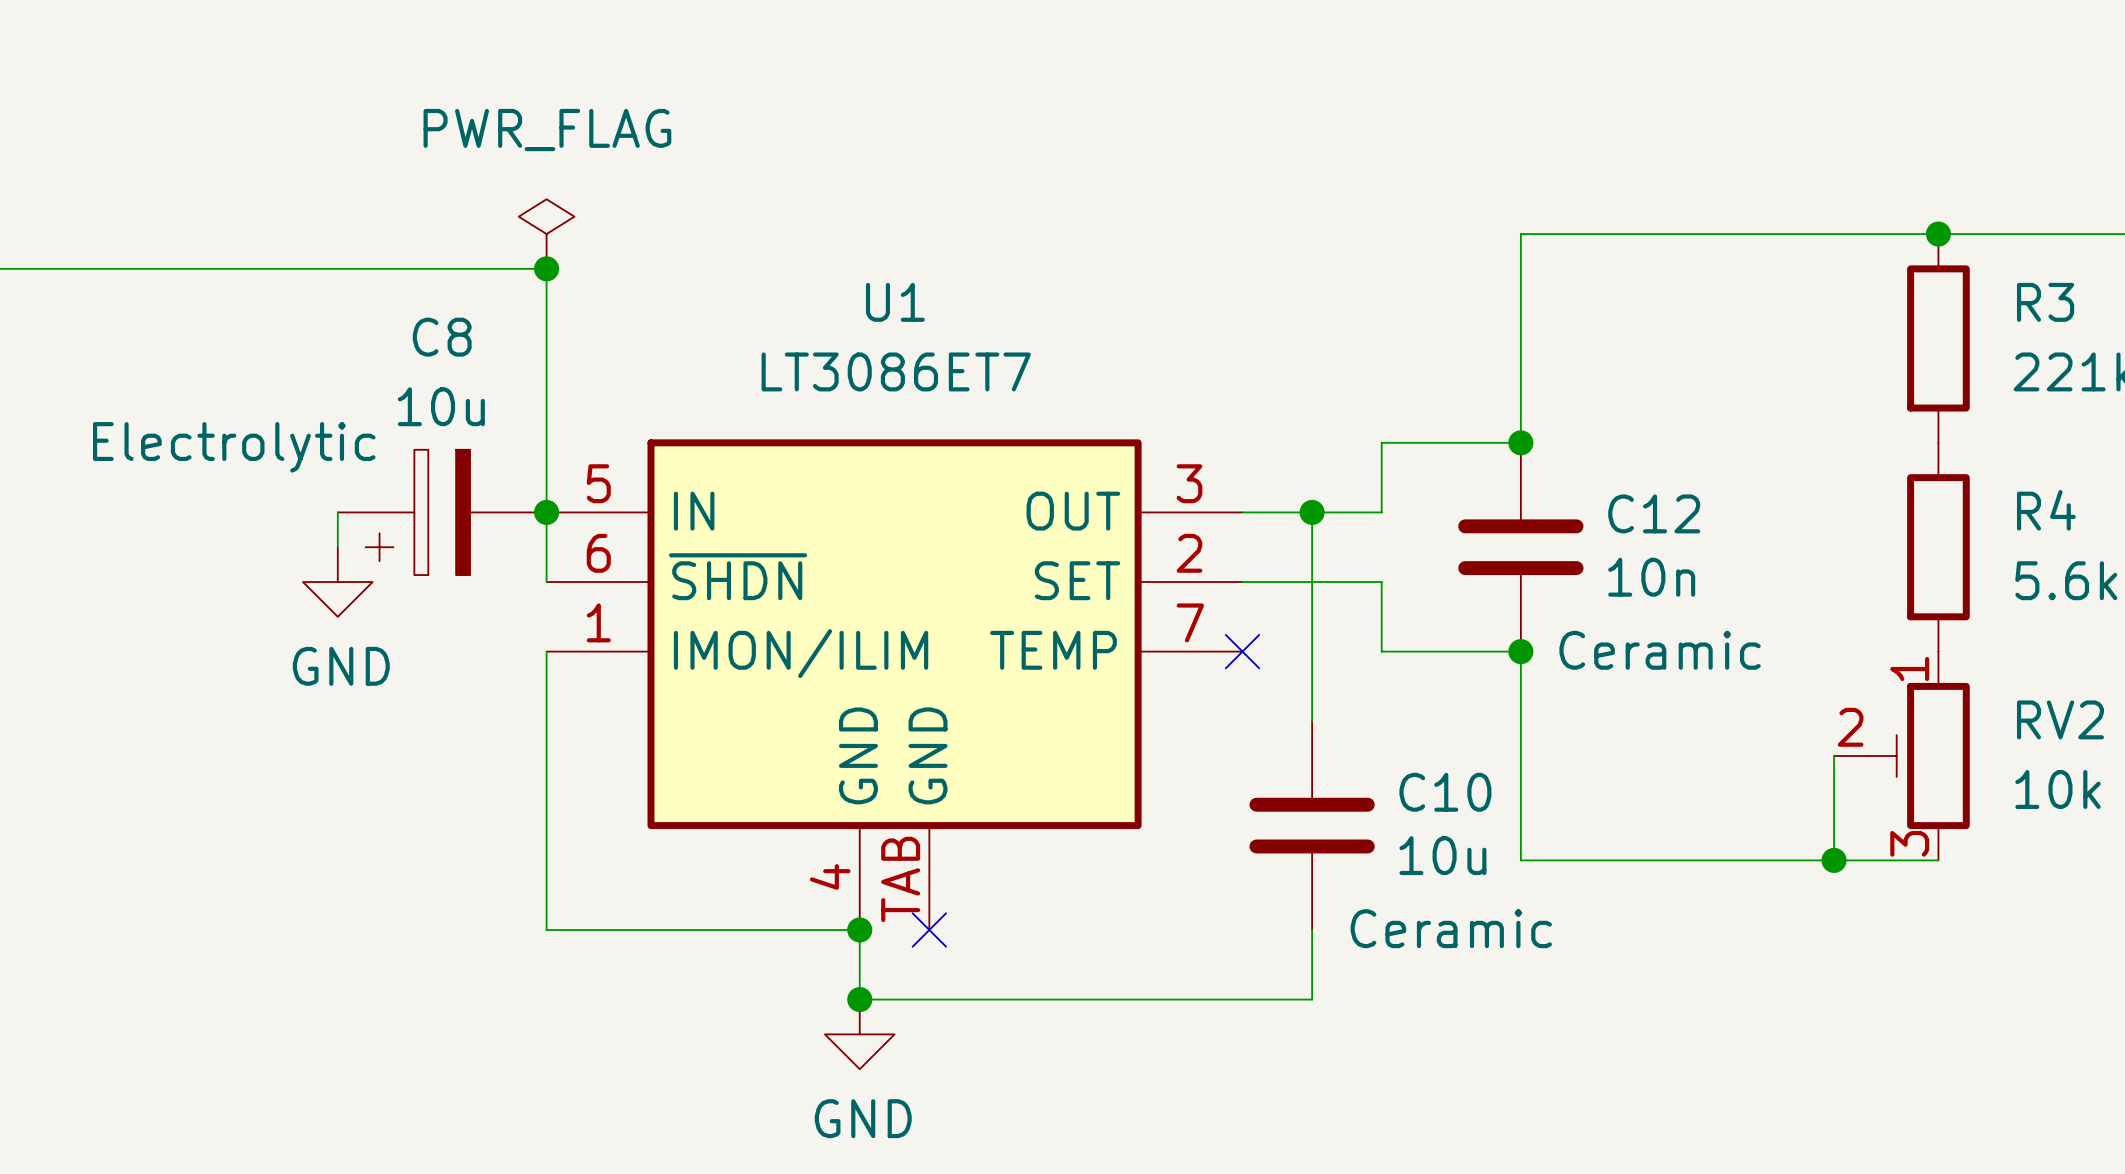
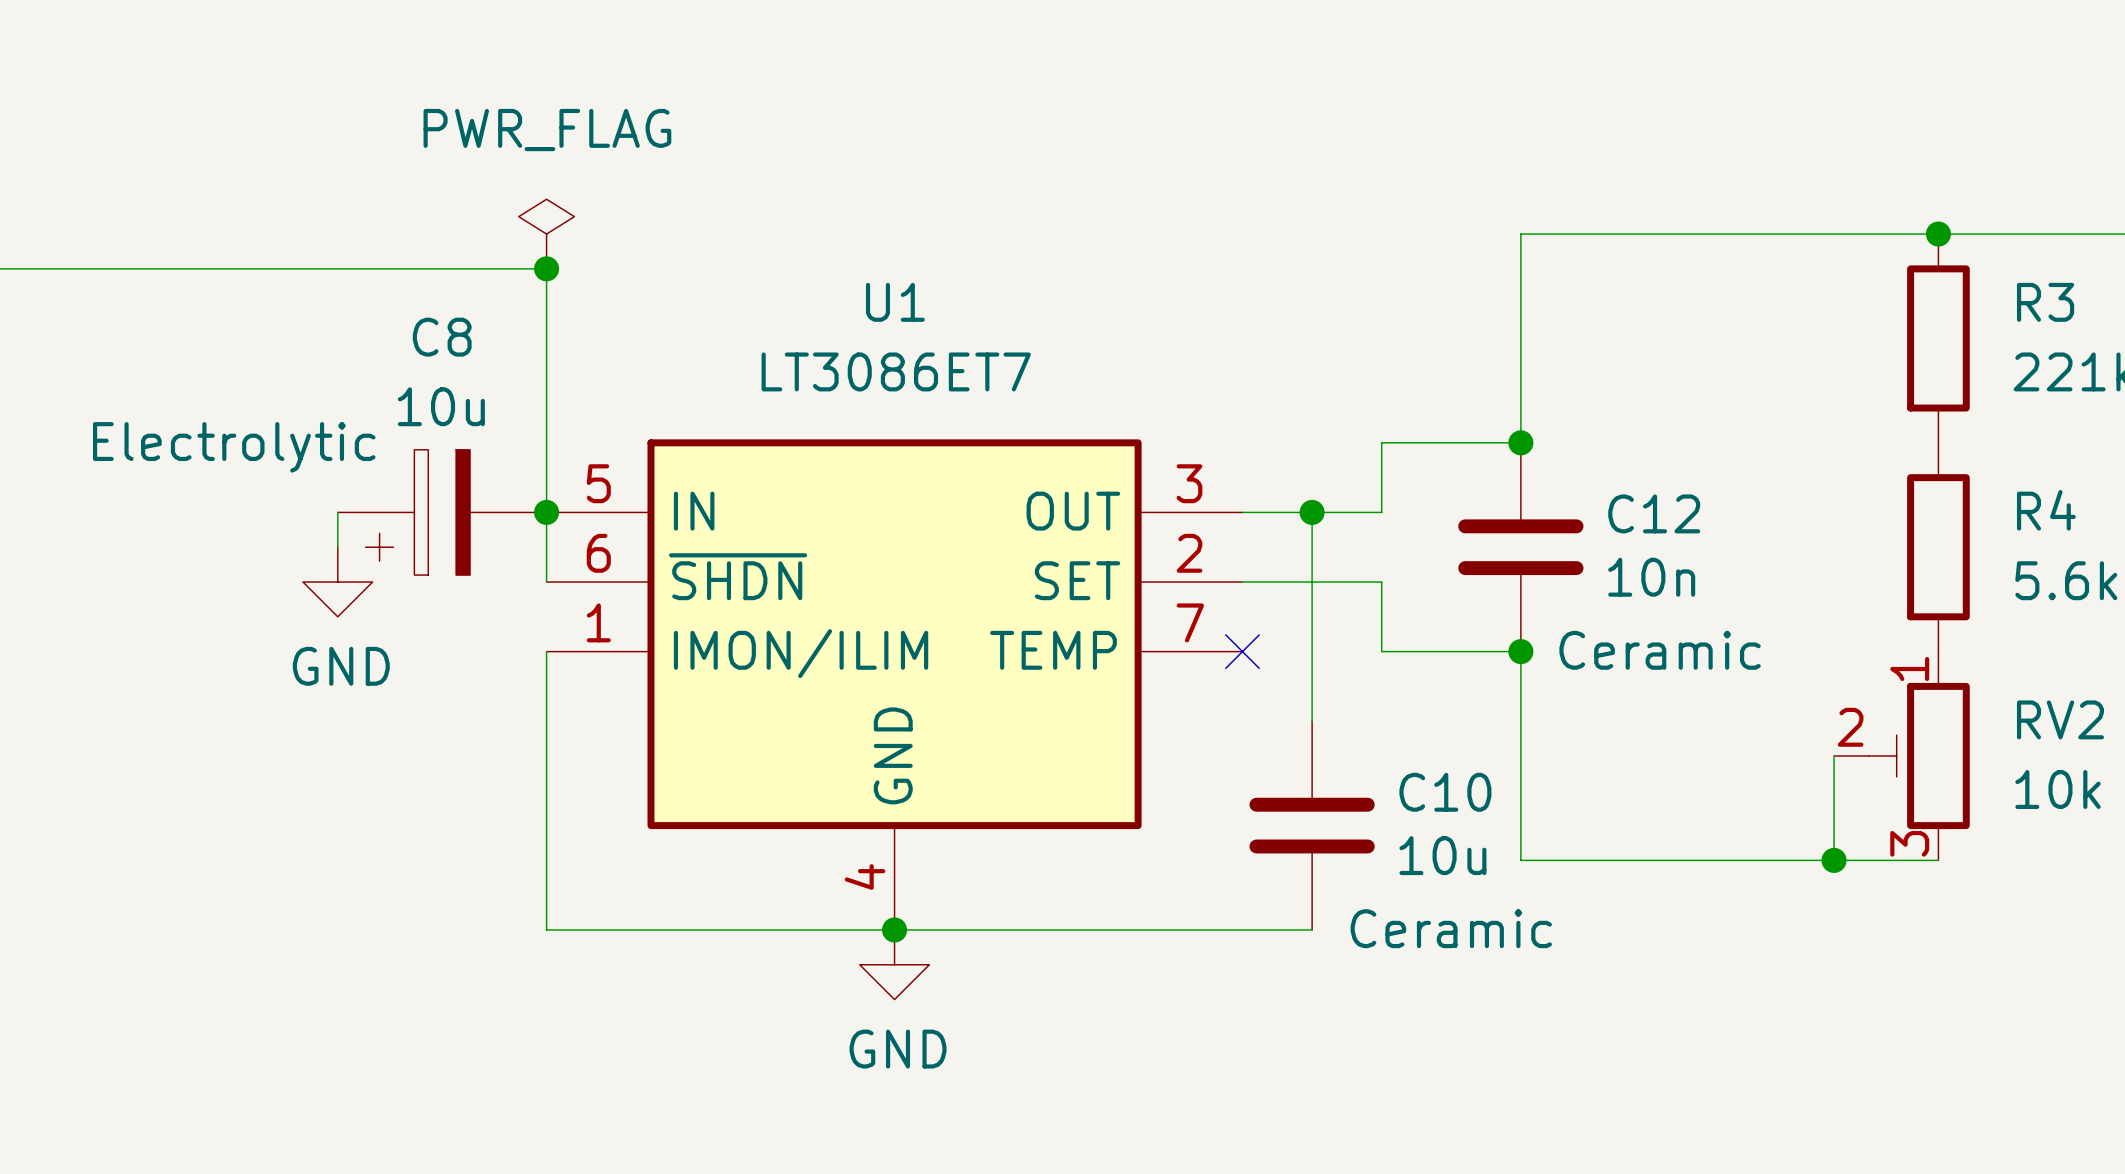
U1 symbol: [546, 439, 1243, 930] -> [546, 439, 1243, 930]
wire: (859, 929) (859, 999) (1312, 999) (1312, 929) -> (859, 929) (1312, 929)
junction position: (859, 929) -> (894, 929)
no-connect mark: (929, 929) -> none
junction: (859, 999) -> none
power symbol position: GND (859, 1034) -> GND (894, 964)

